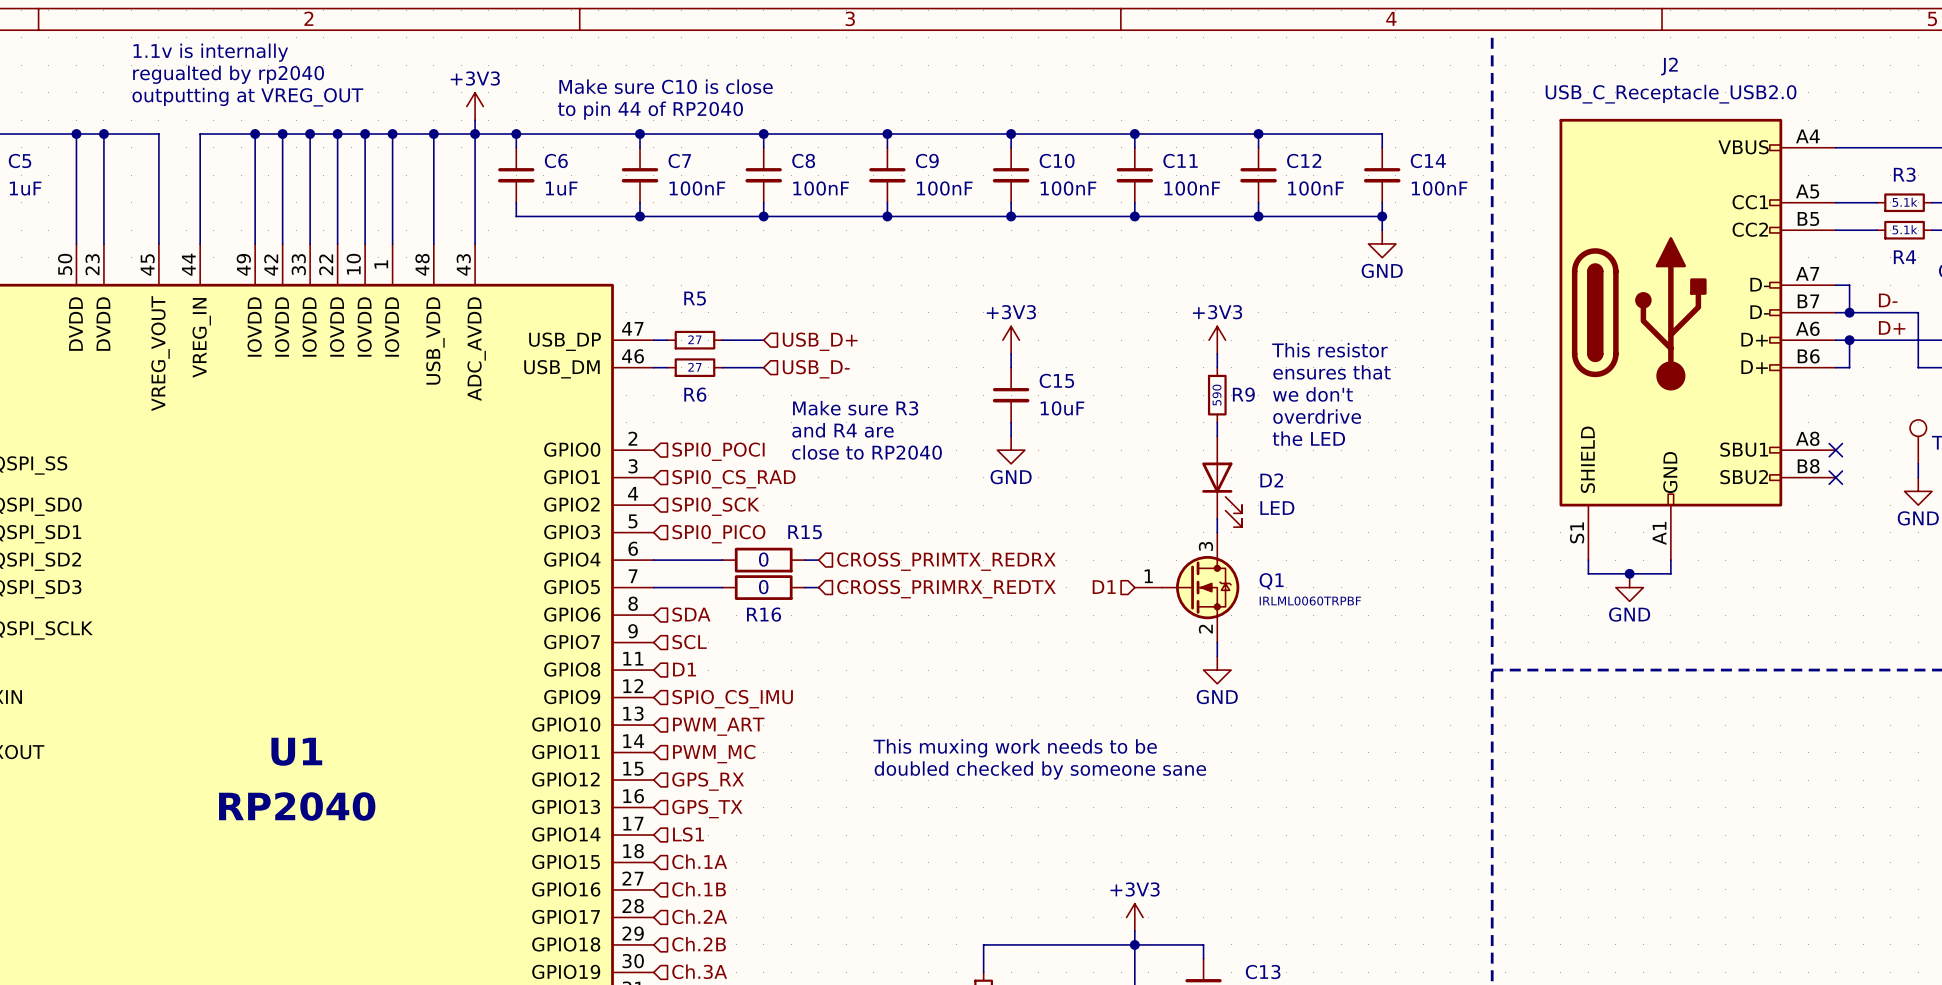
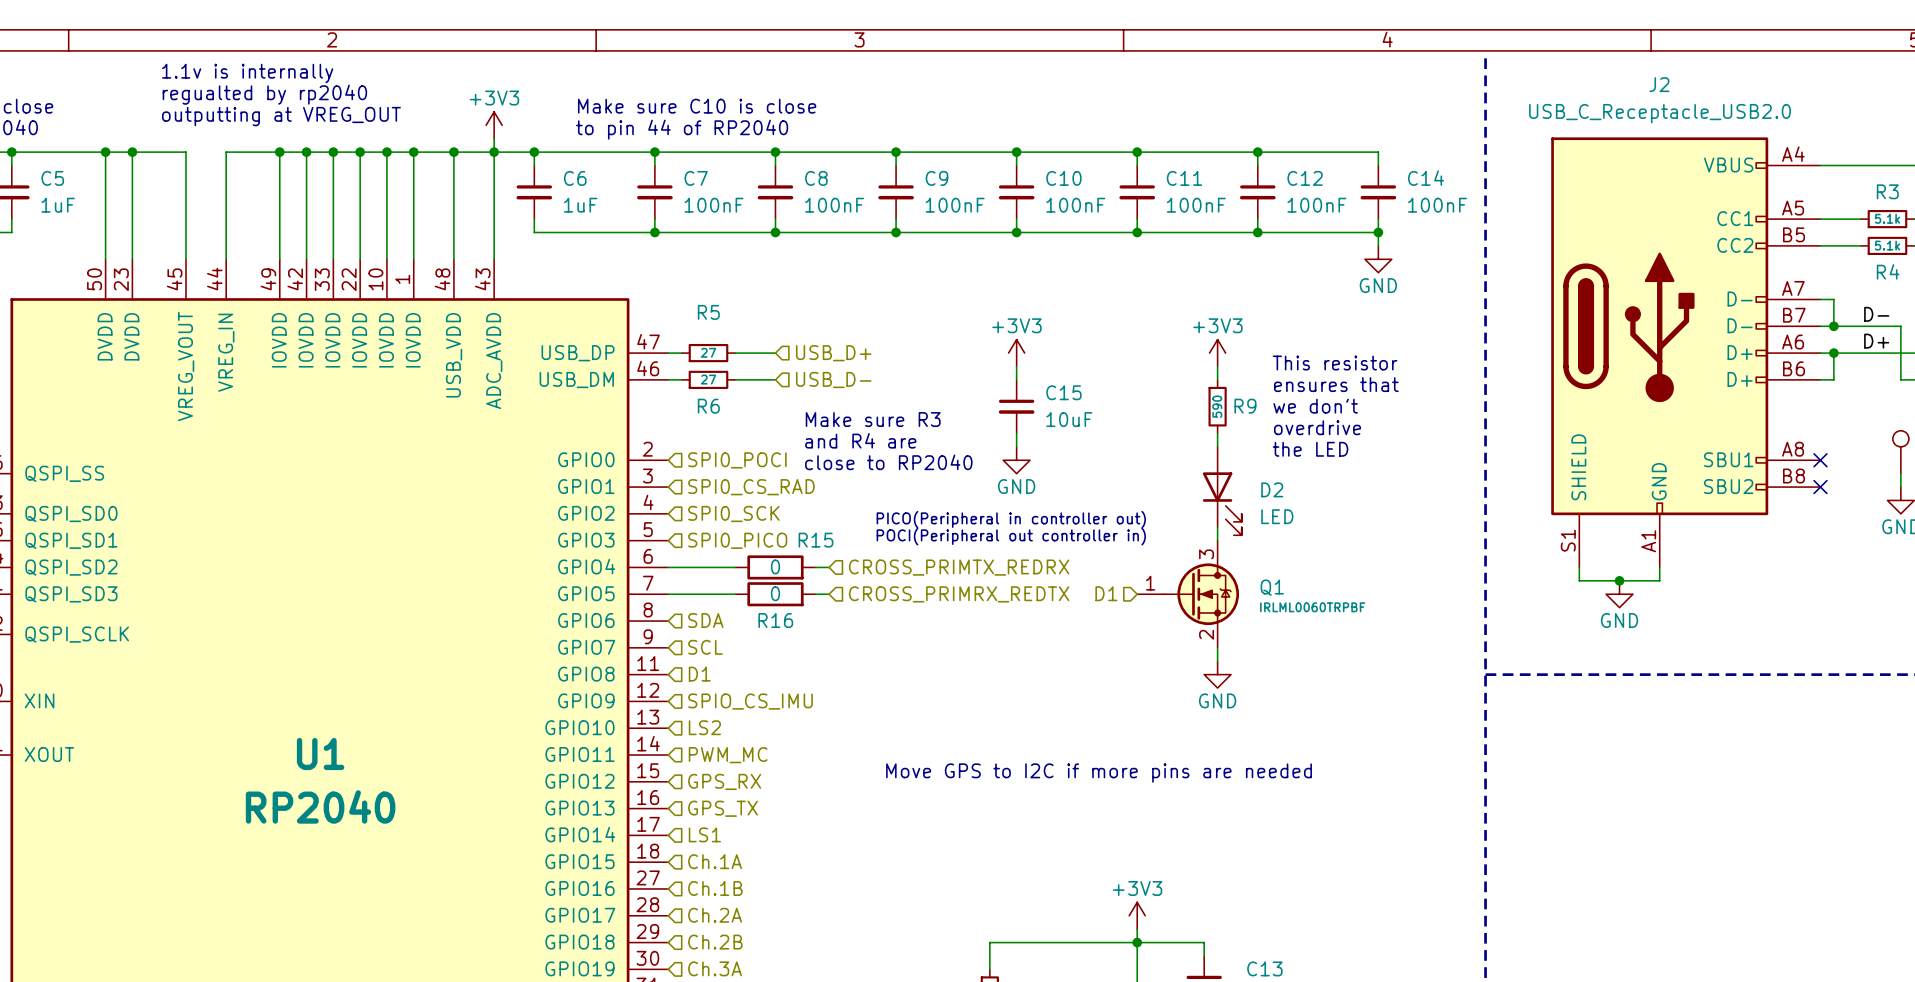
text: none -> PICO(Peripheral in controller out) (1011, 519)
text: none -> POCI(Peripheral out controller in) (1011, 536)
hierarchical label: PWM_ART (718, 726) -> LS2 (704, 727)
text: This muxing work needs to be (1015, 748) -> none
text: doubled checked by someone sane (1040, 770) -> Move GPS to I2C if more pins are needed (1099, 773)

